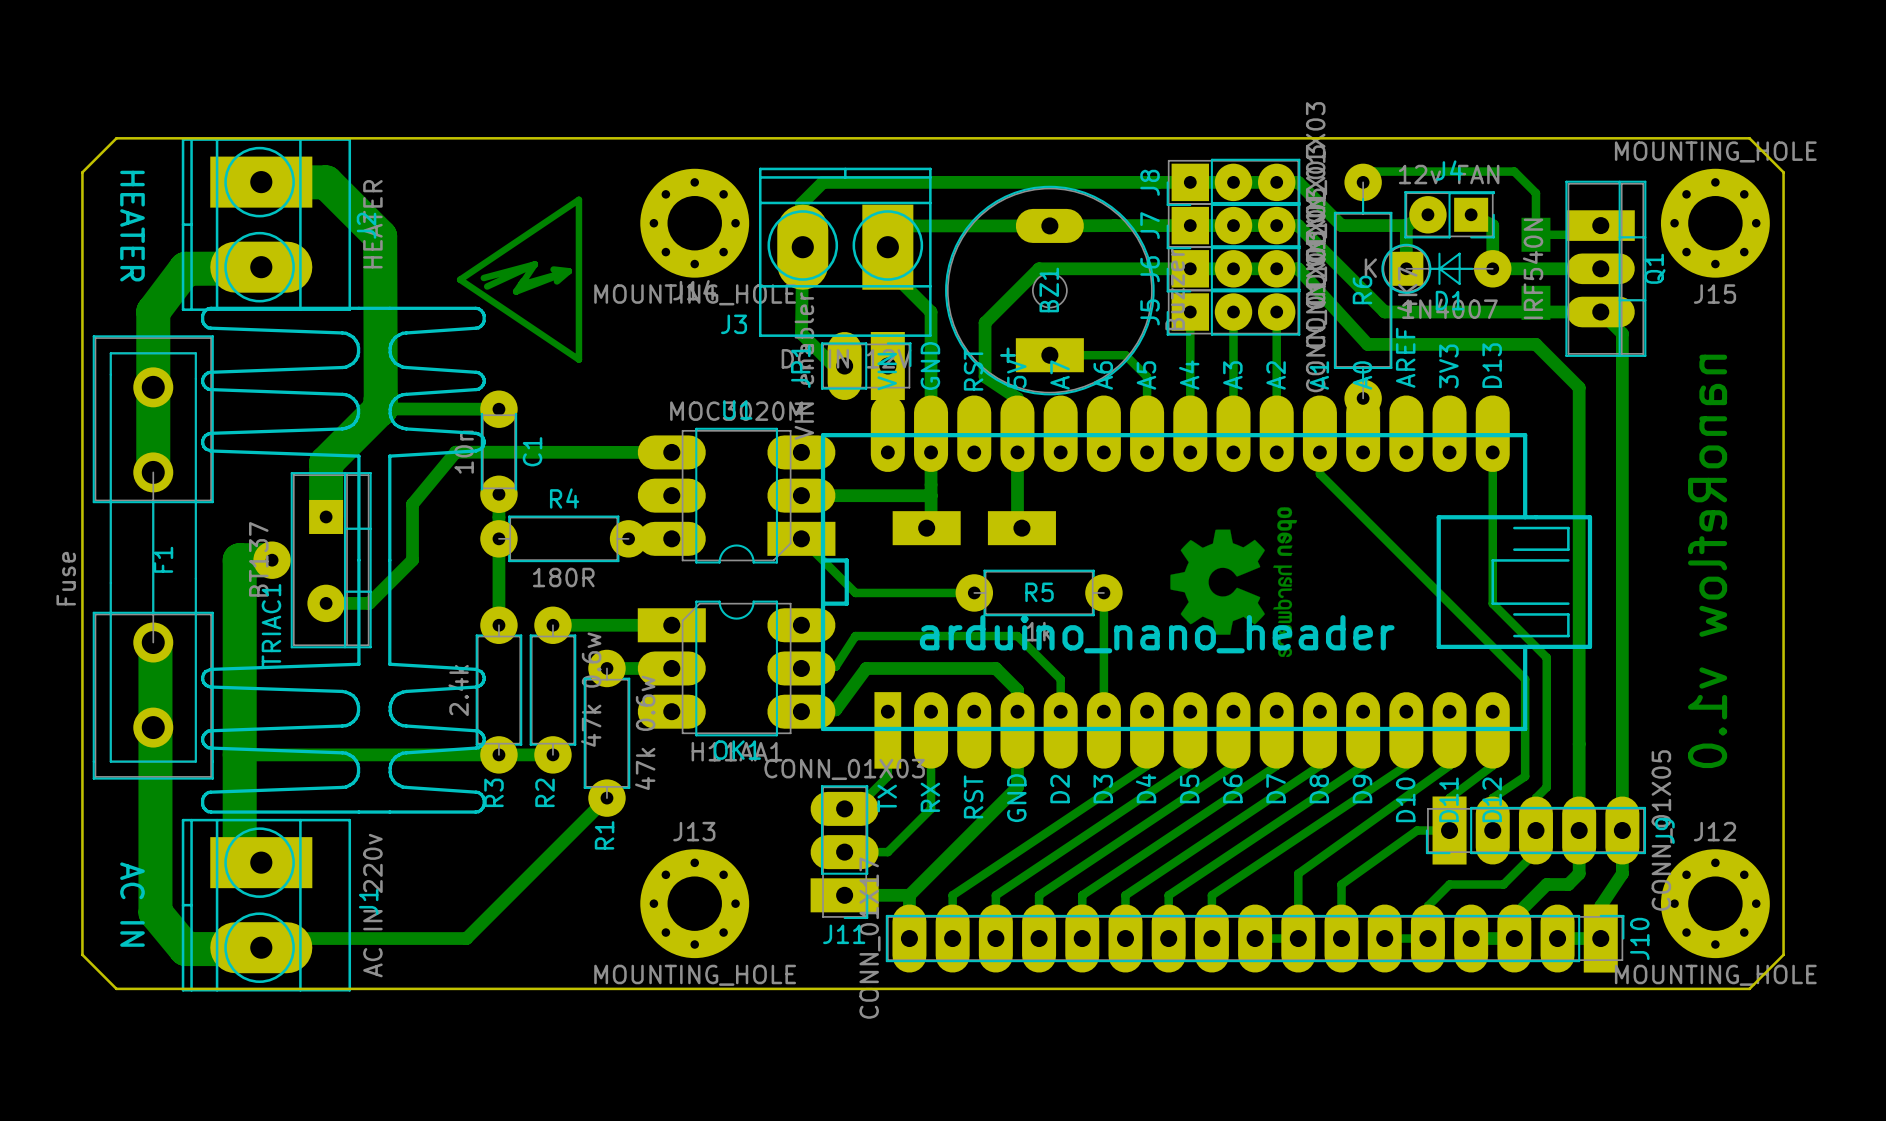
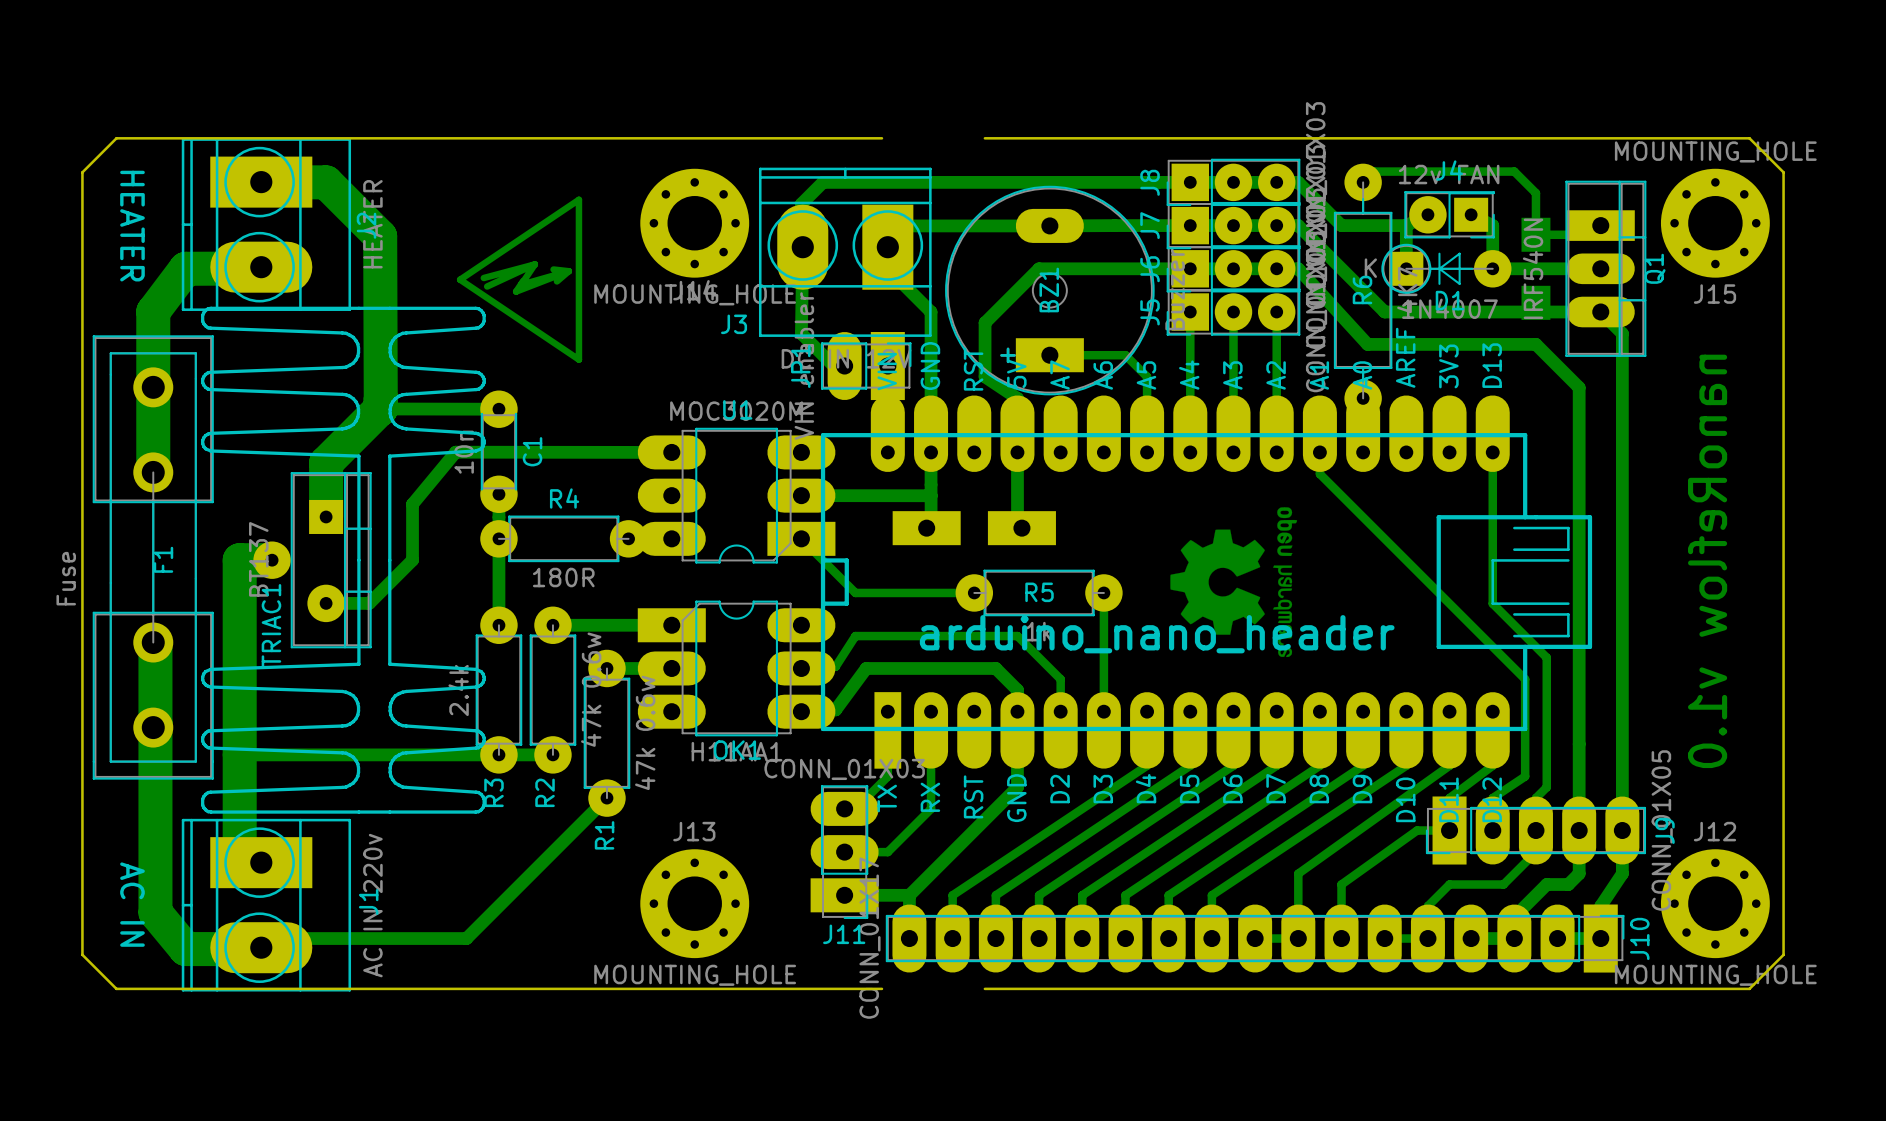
board edge: (881, 138) (984, 138) -> none
board edge: (881, 988) (984, 988) -> none

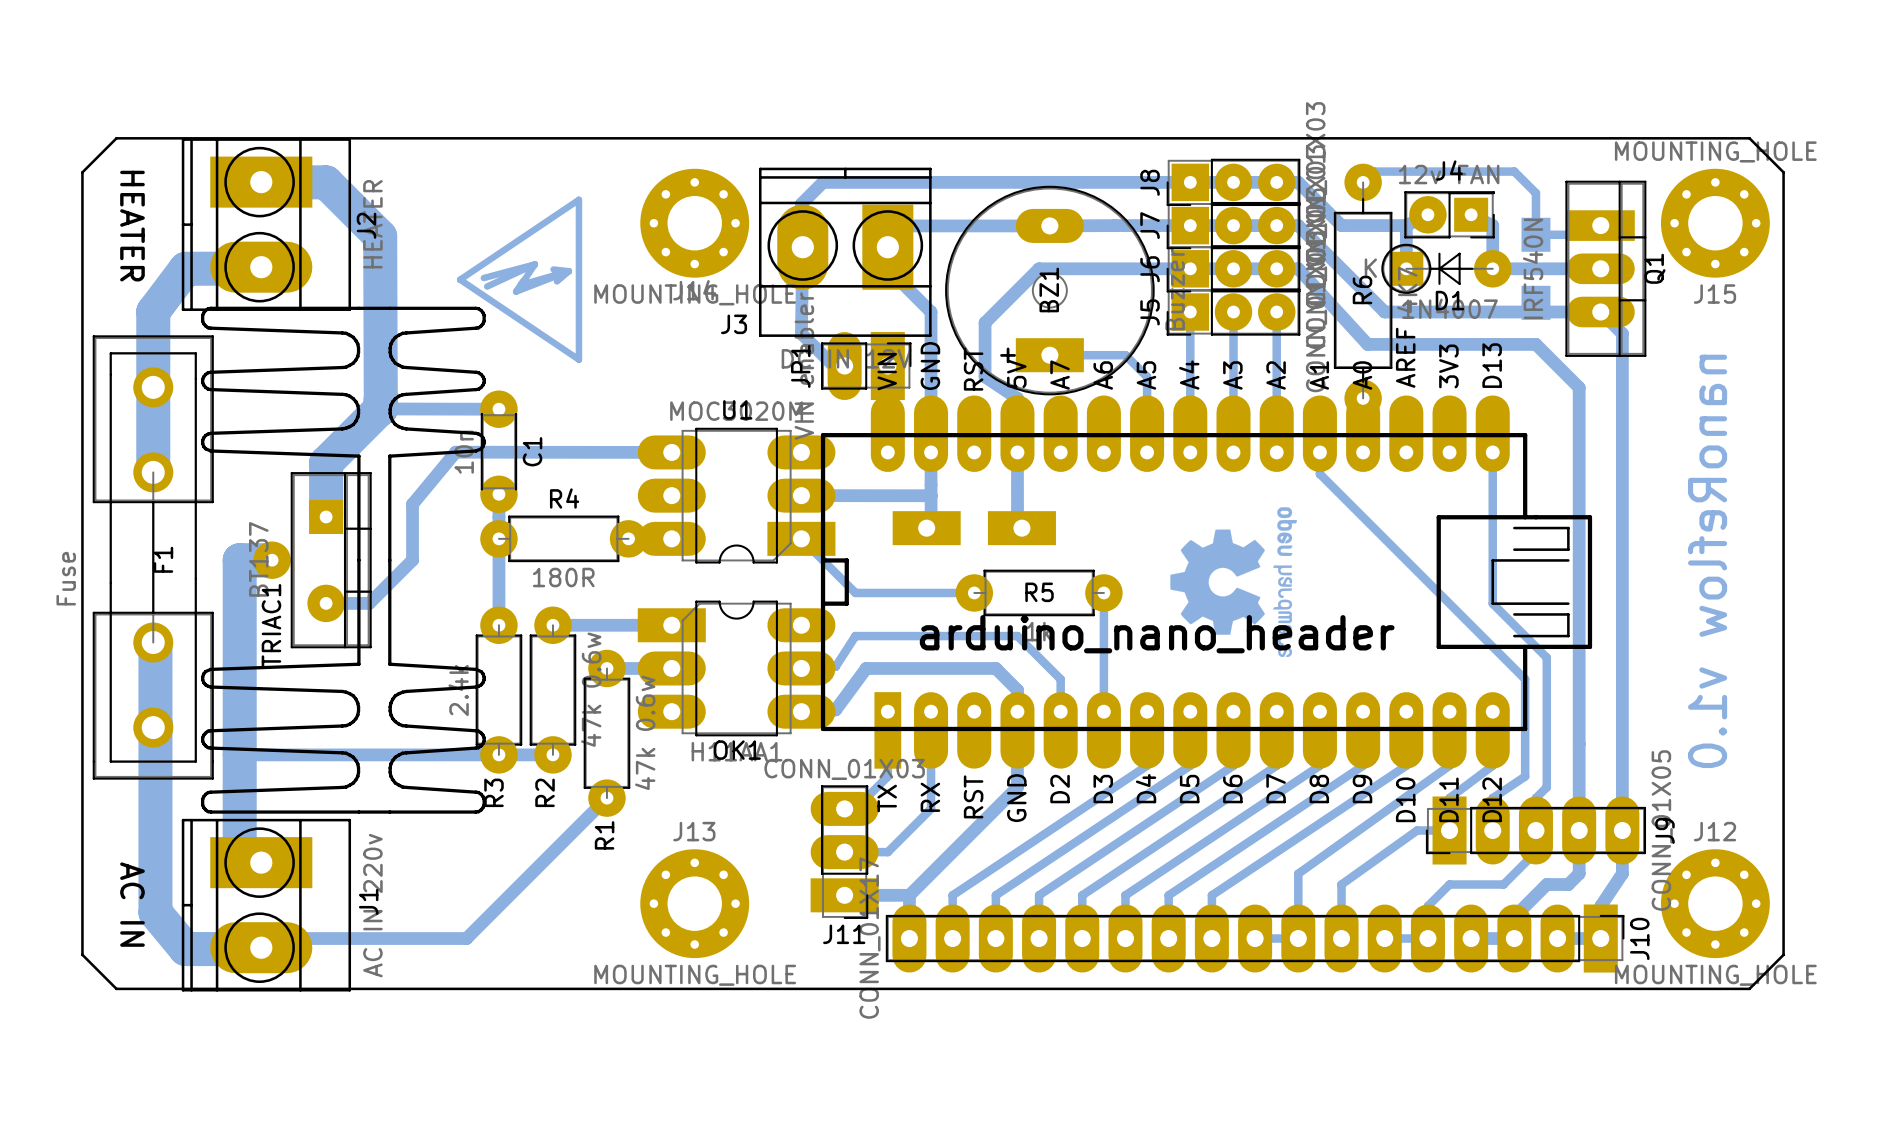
board edge: none -> (881, 138) (984, 138)
board edge: none -> (881, 988) (984, 988)

